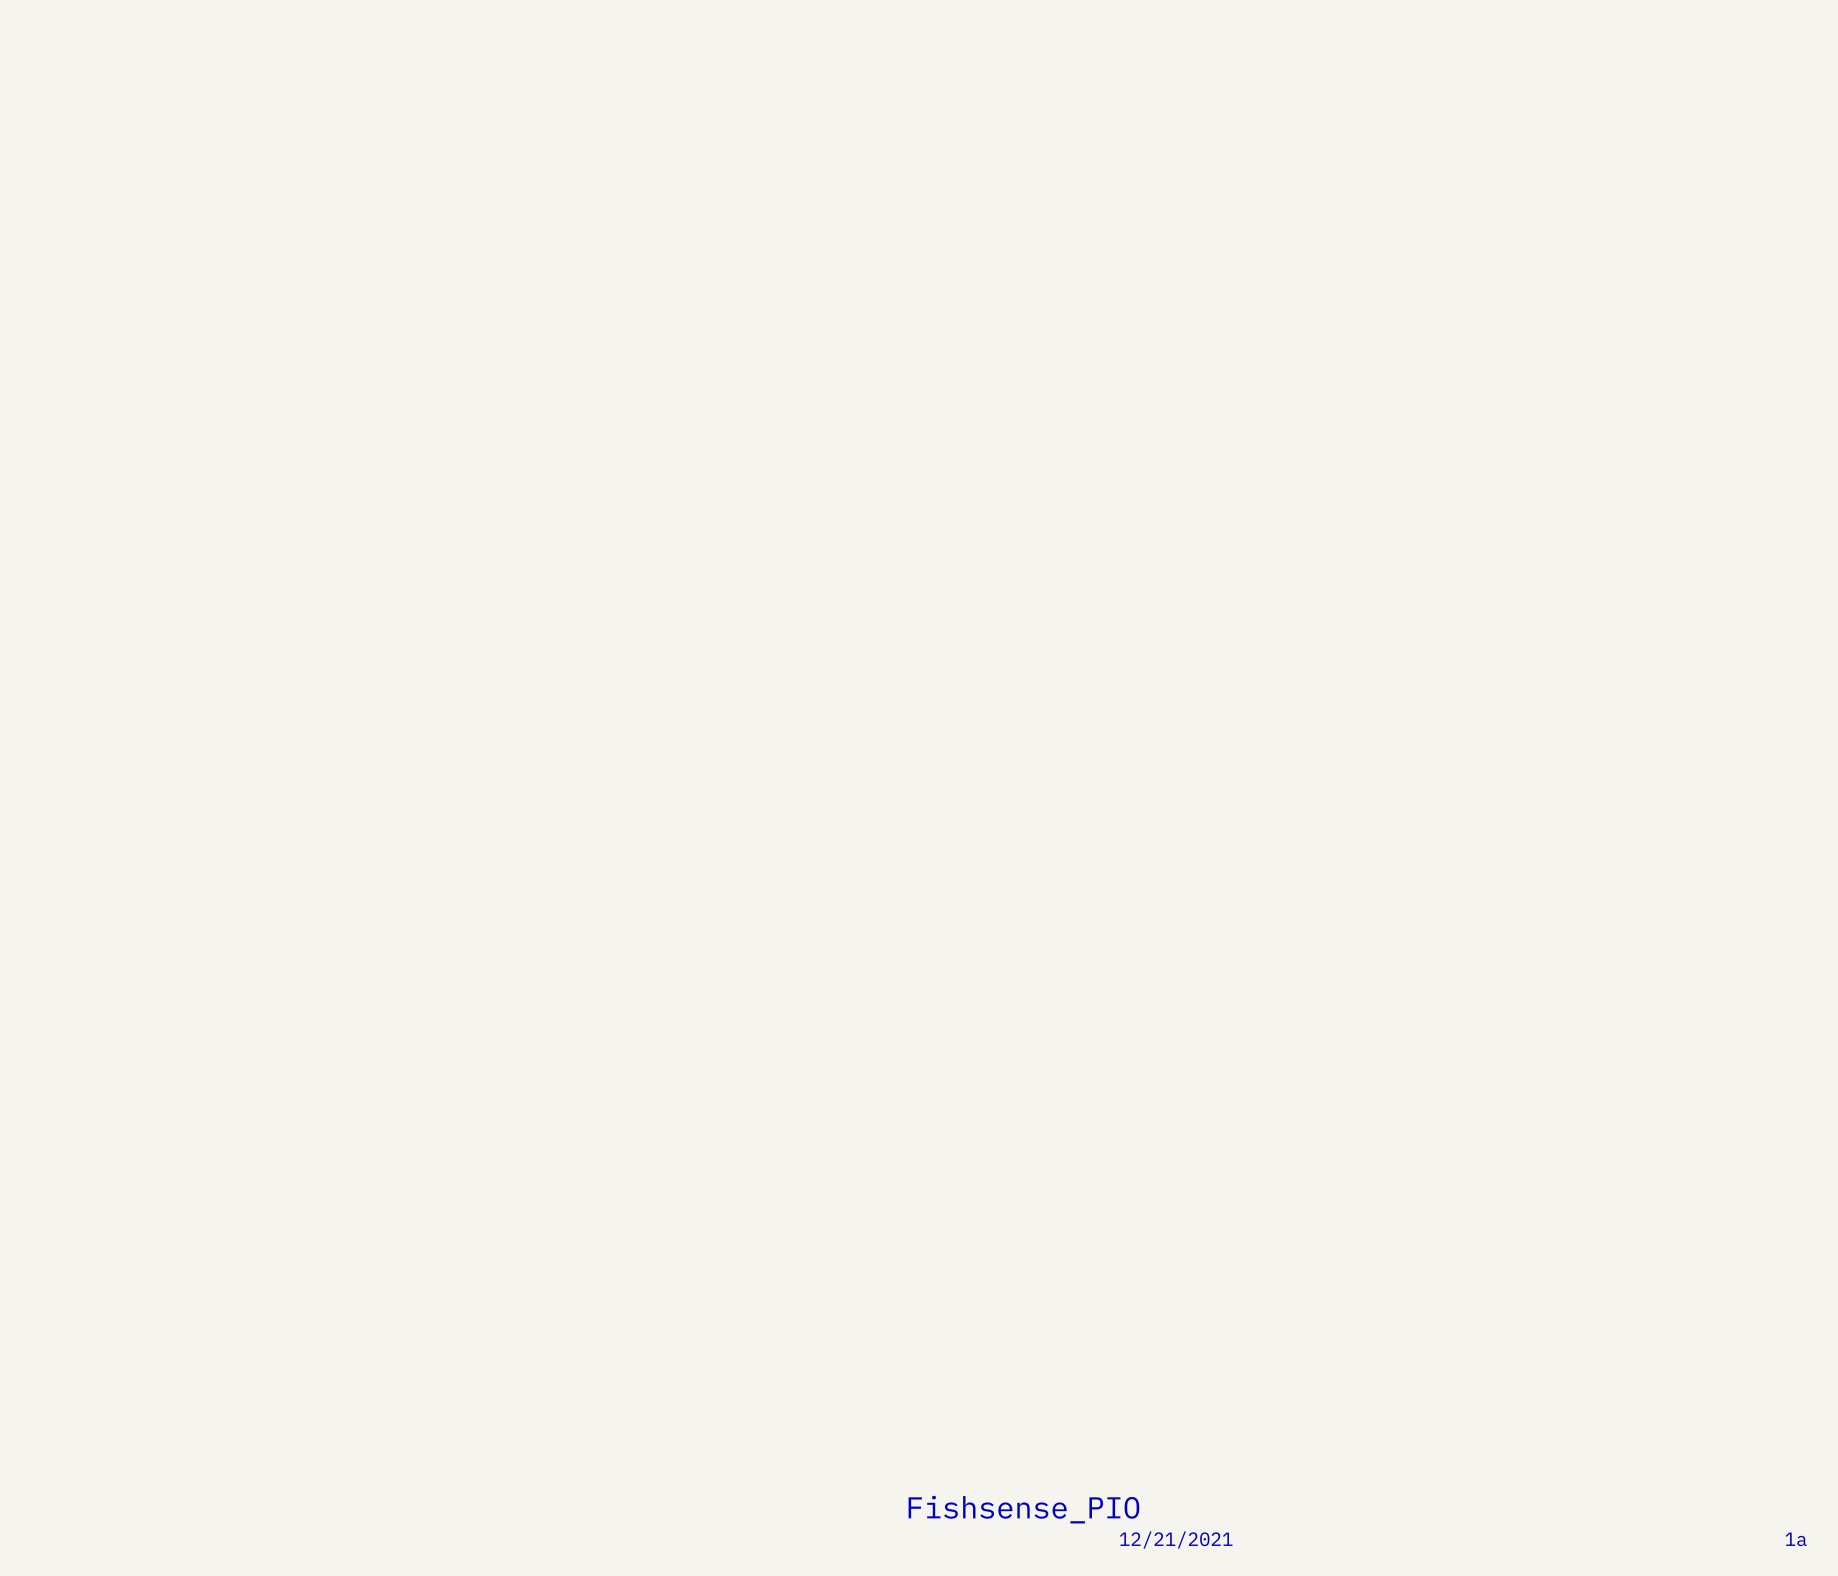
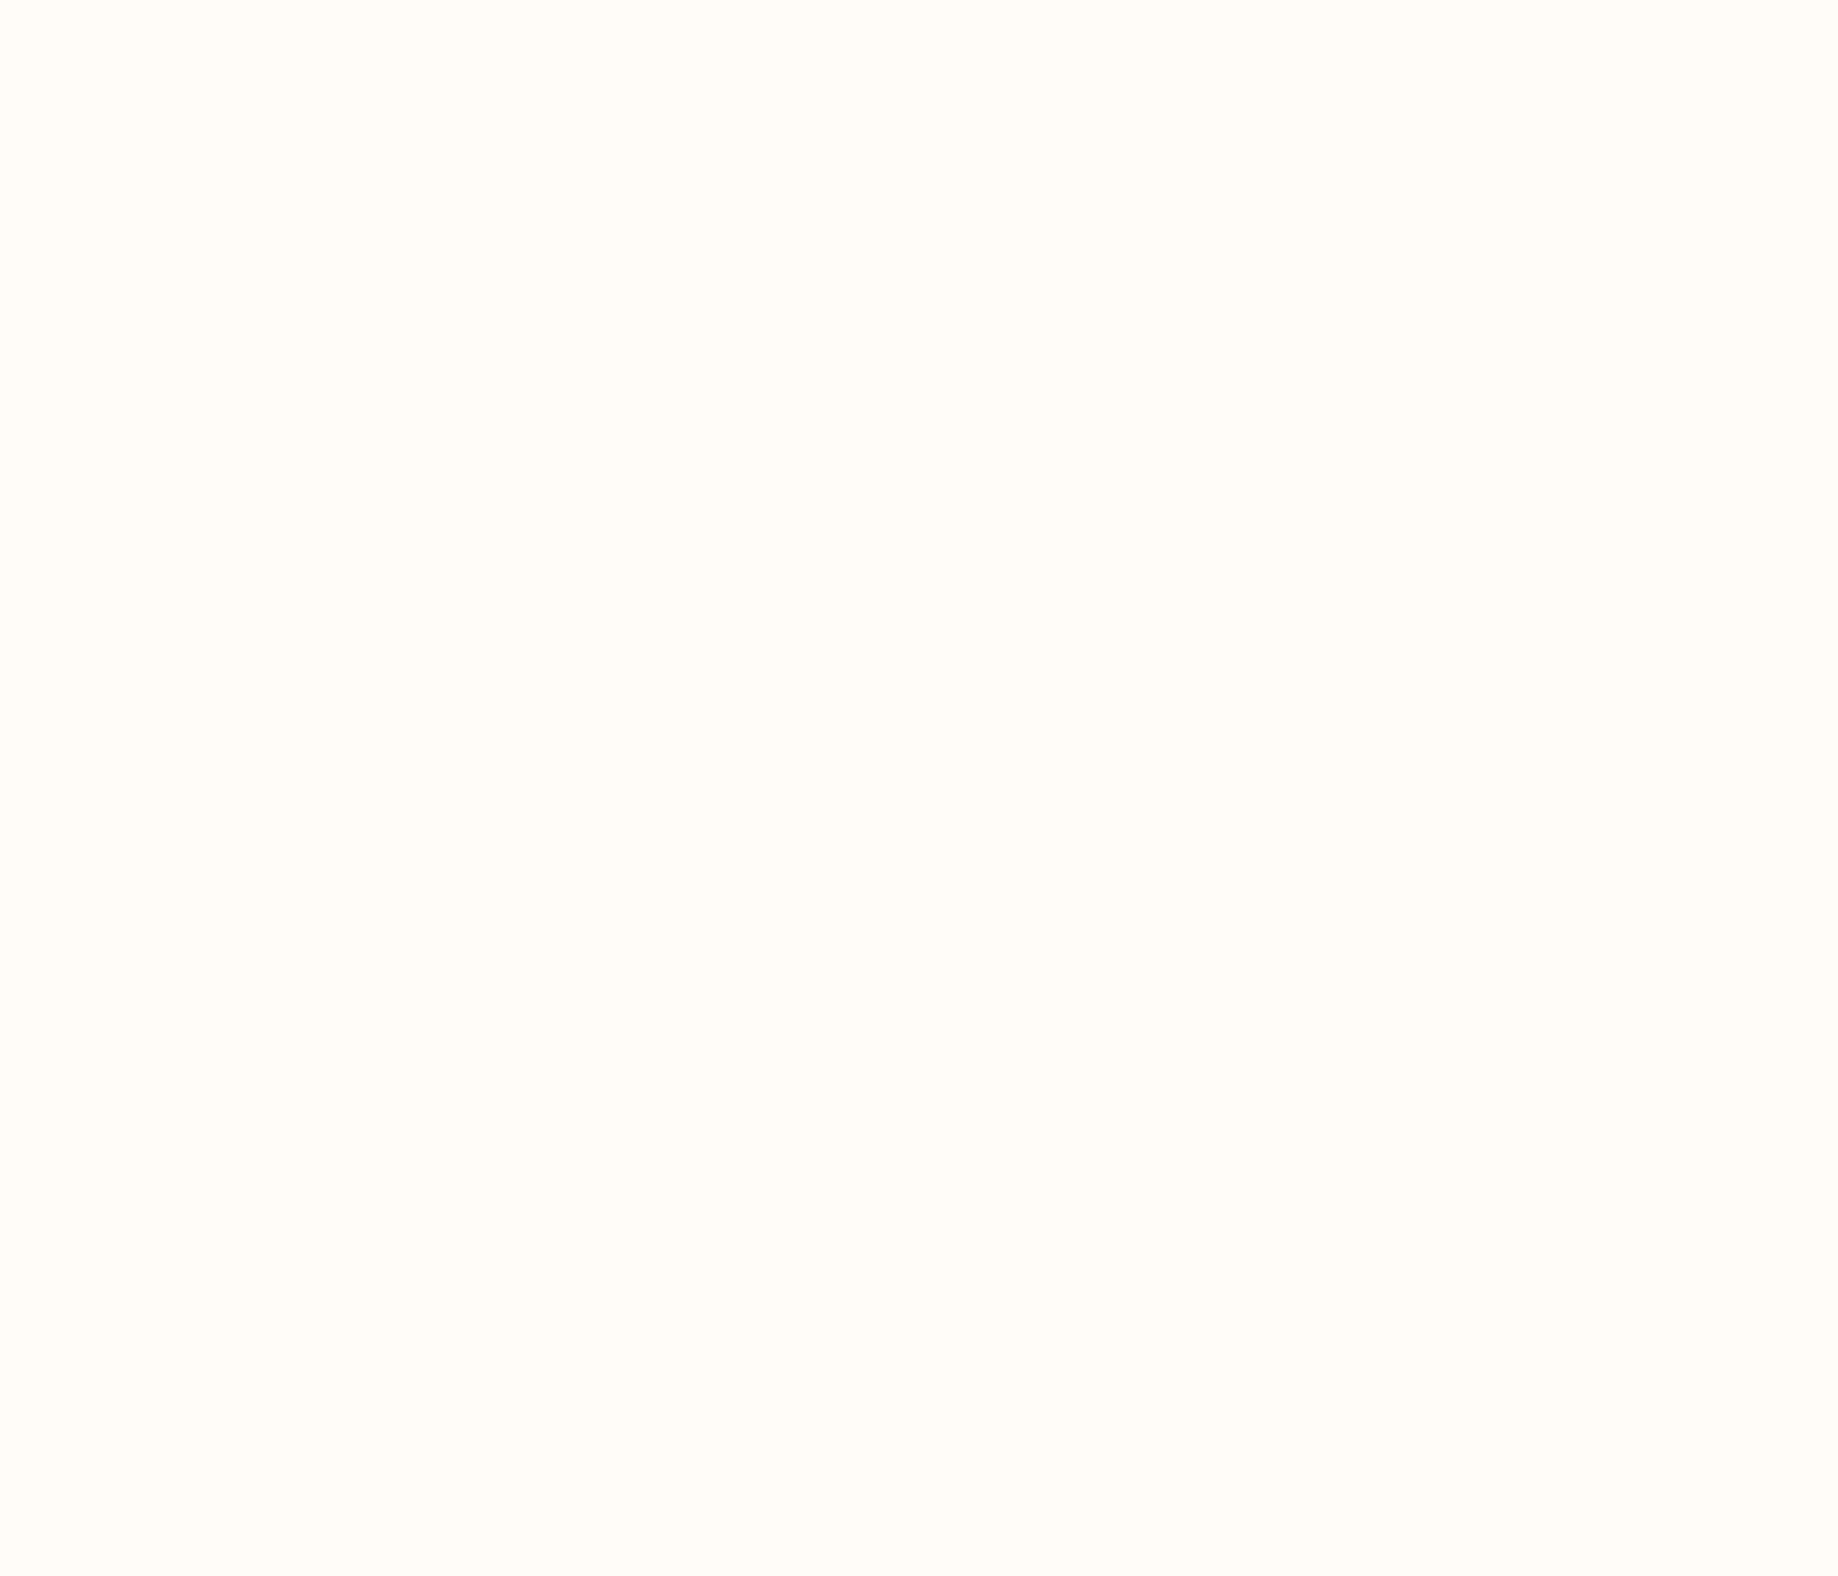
text: Fishsense_PIO (1023, 1509) -> none
text: 12/21/2021 (1176, 1539) -> none
text: 1a (1796, 1539) -> none

